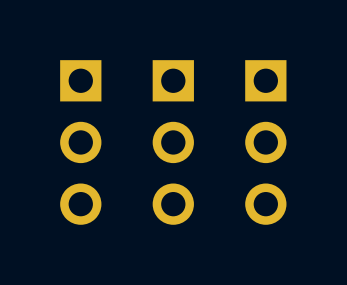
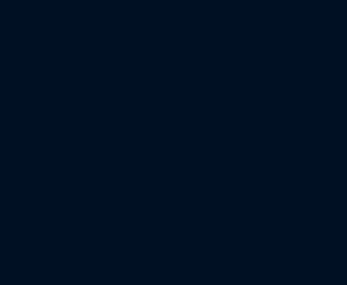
part: (80, 142) -> none
part: (173, 142) -> none
part: (265, 142) -> none

